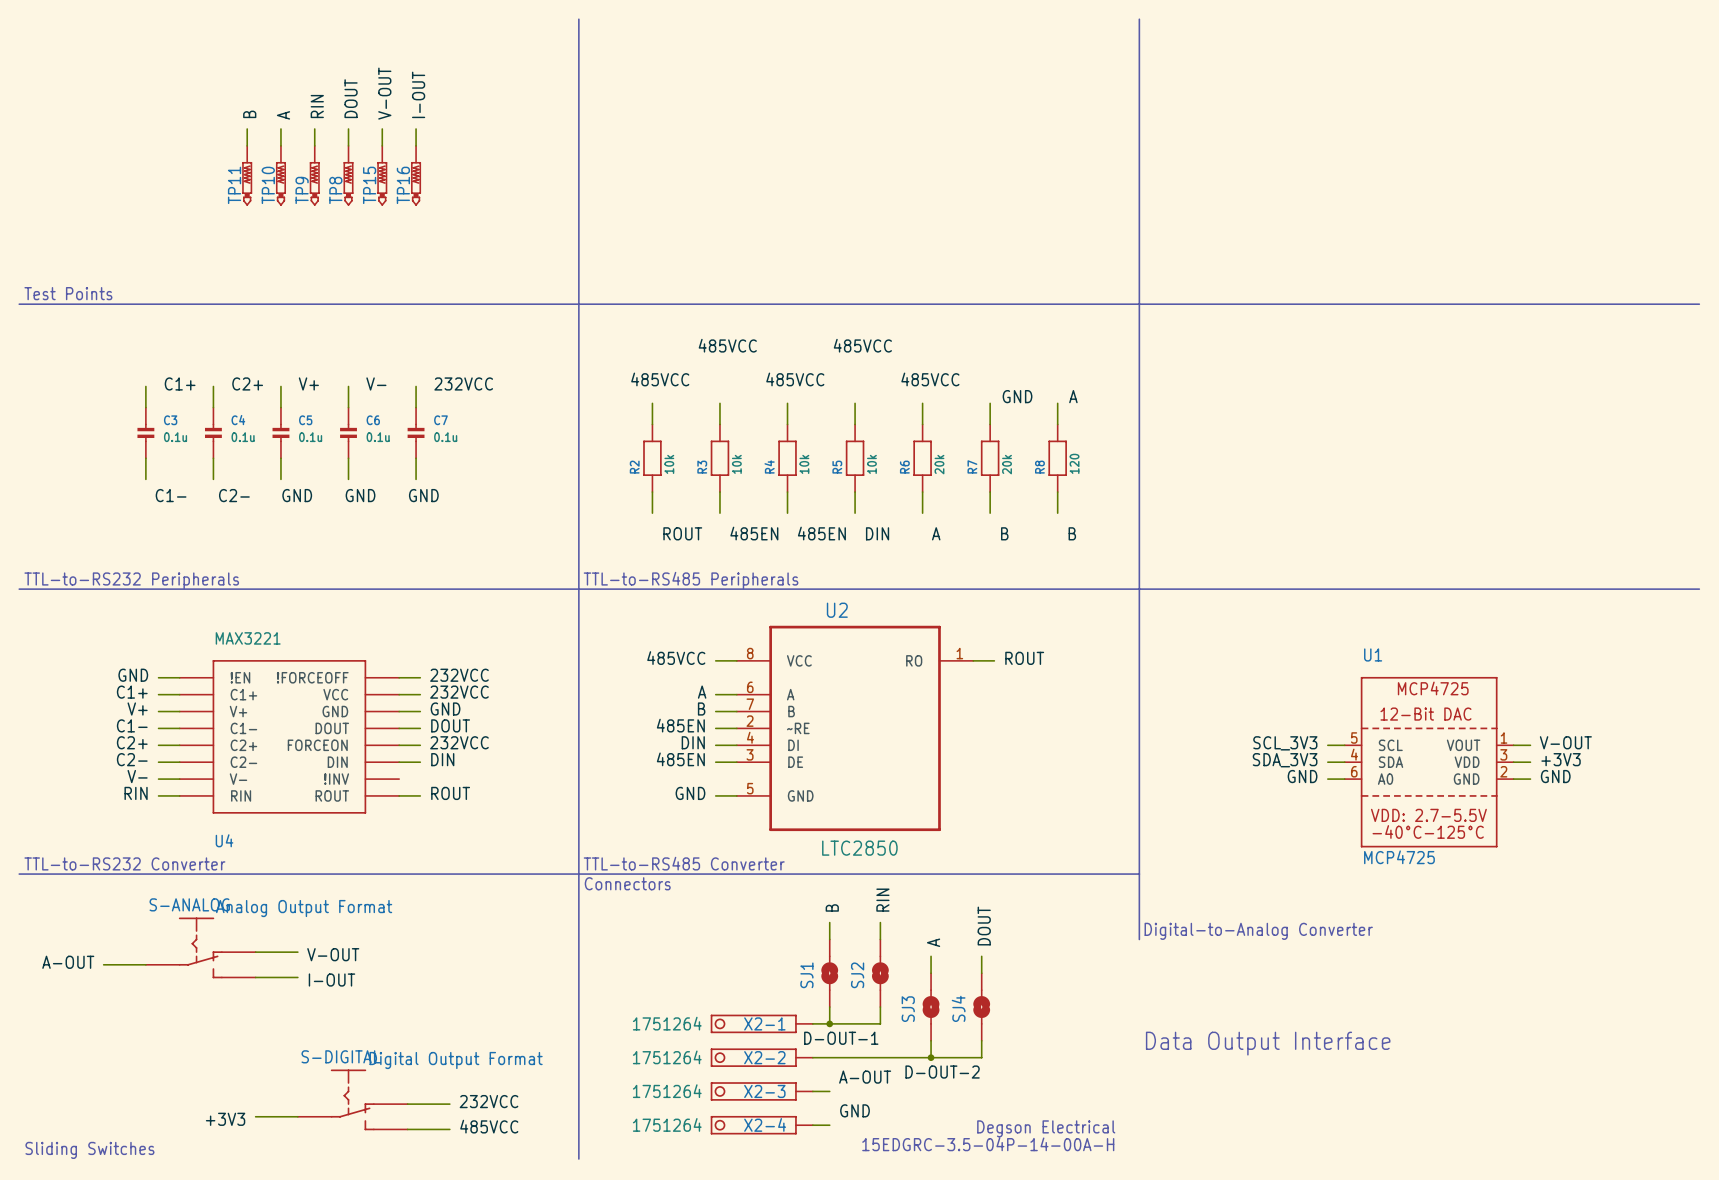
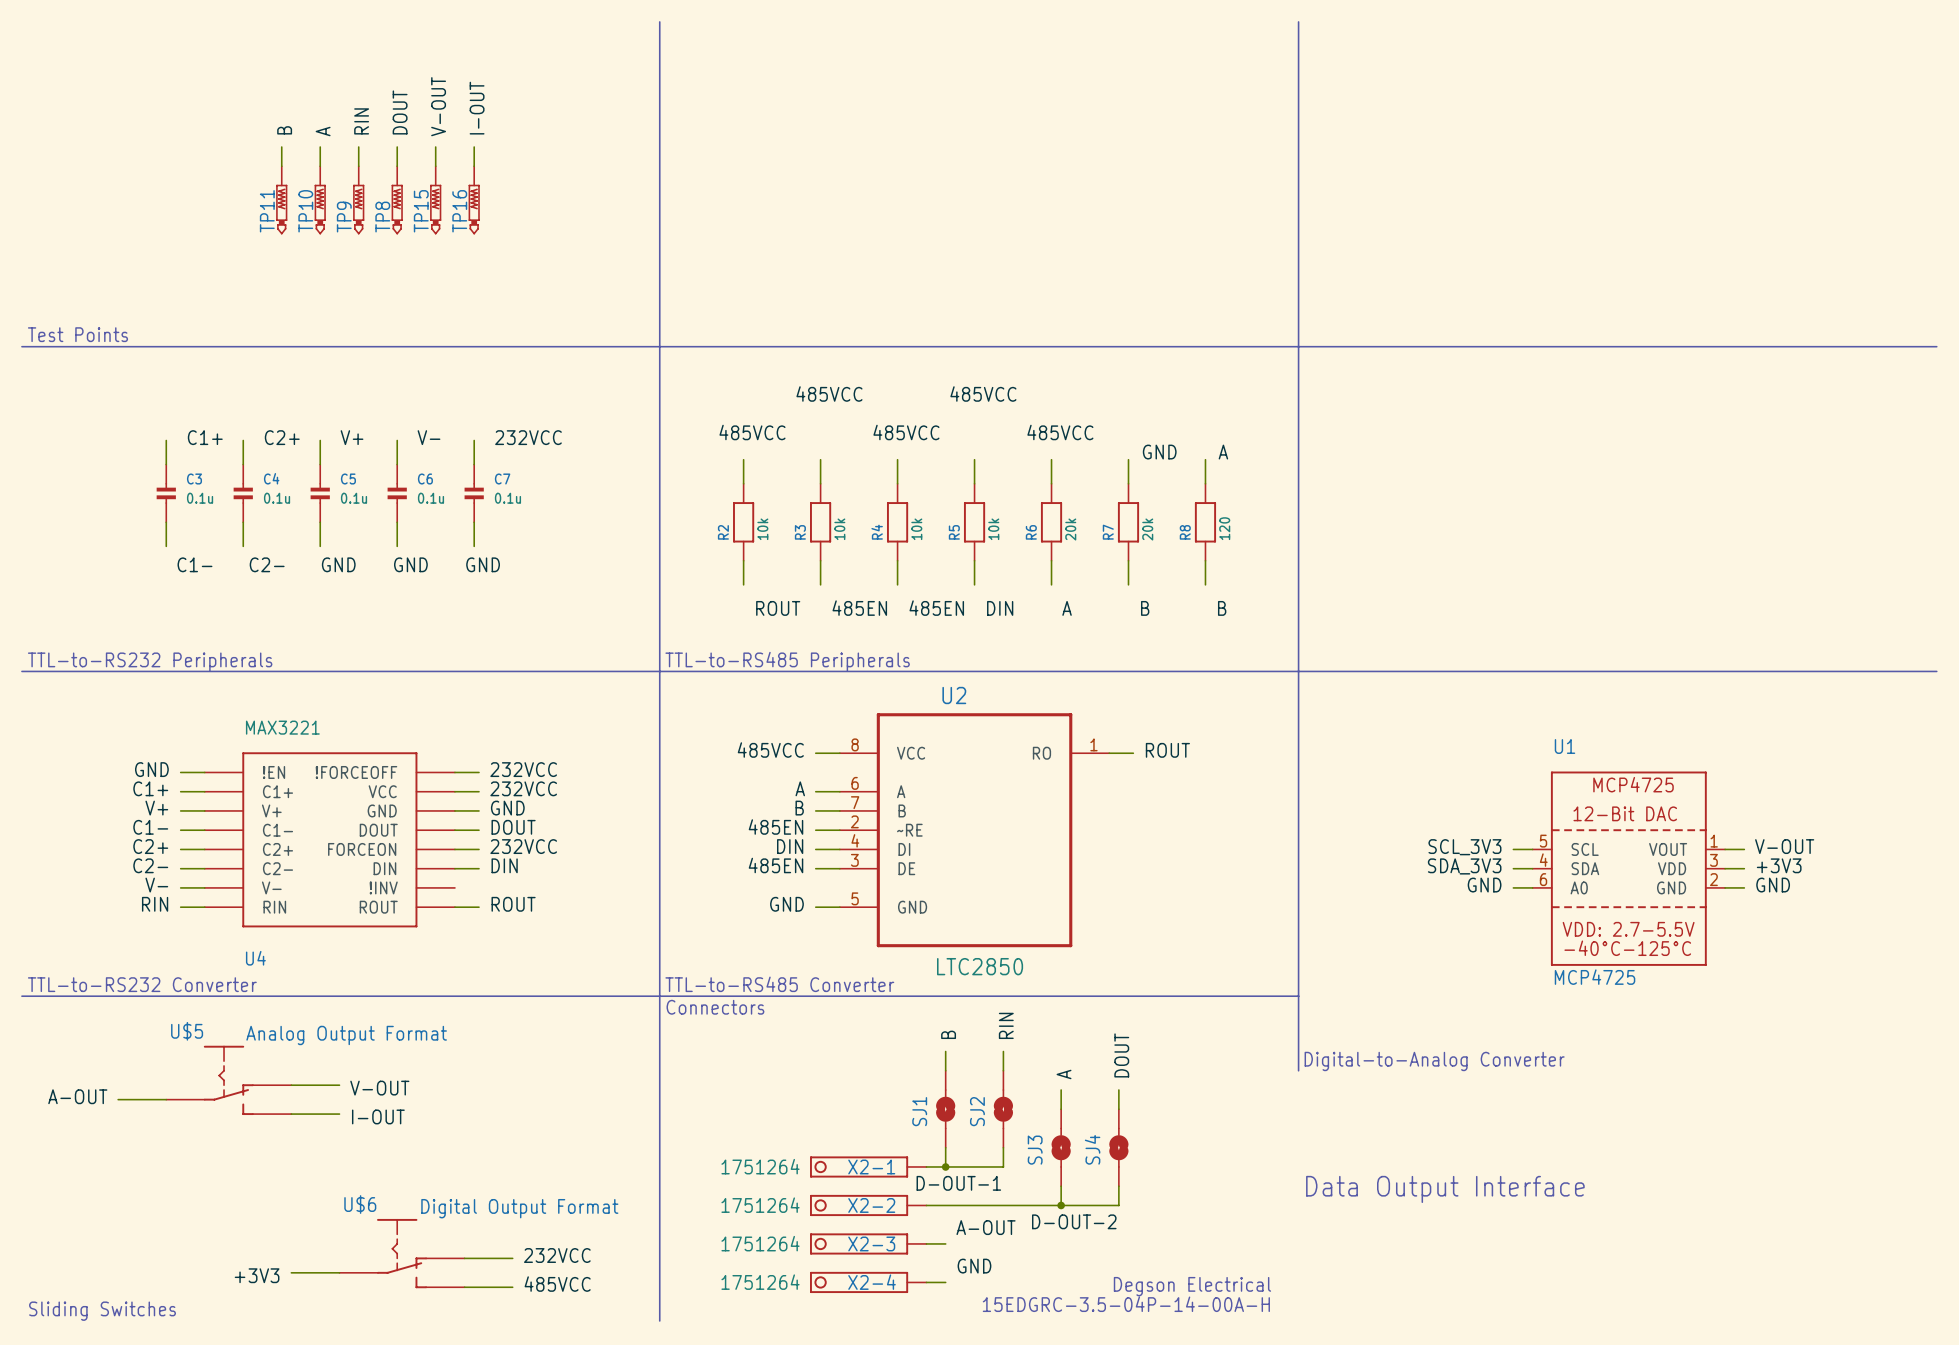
S-ANALOG name: S-ANALOG (189, 904) -> U$5 (187, 1031)
S-DIGITAL name: S-DIGITAL (340, 1056) -> U$6 (360, 1204)

